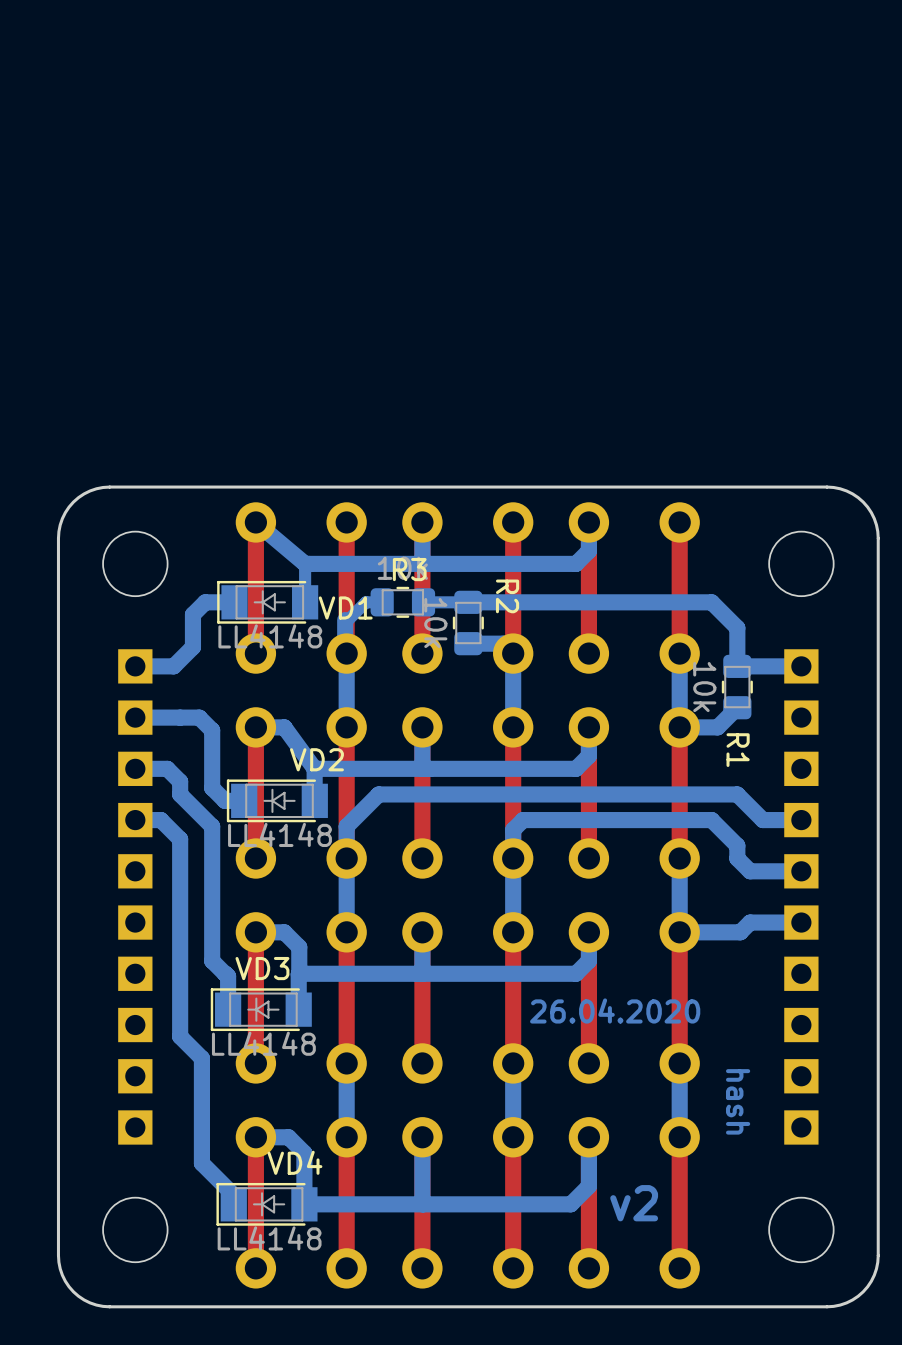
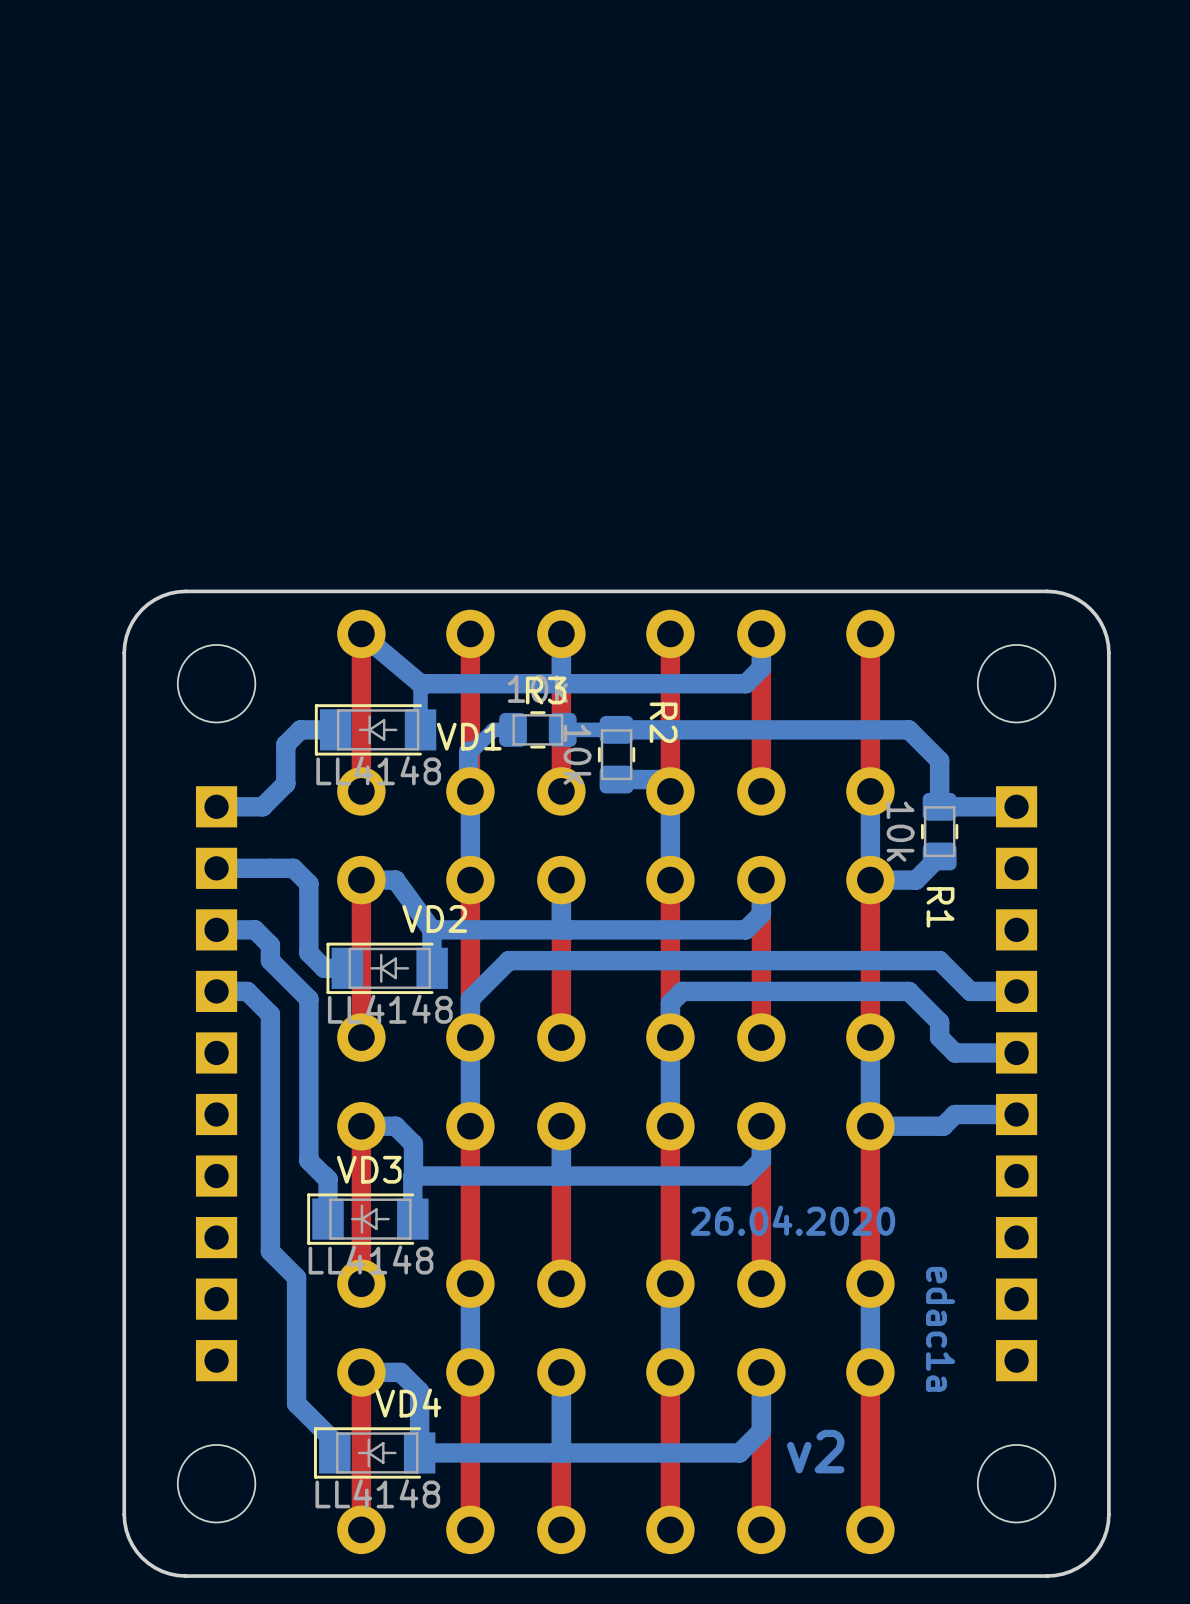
text: hash (738, 1101) -> edac1a (940, 1329)

